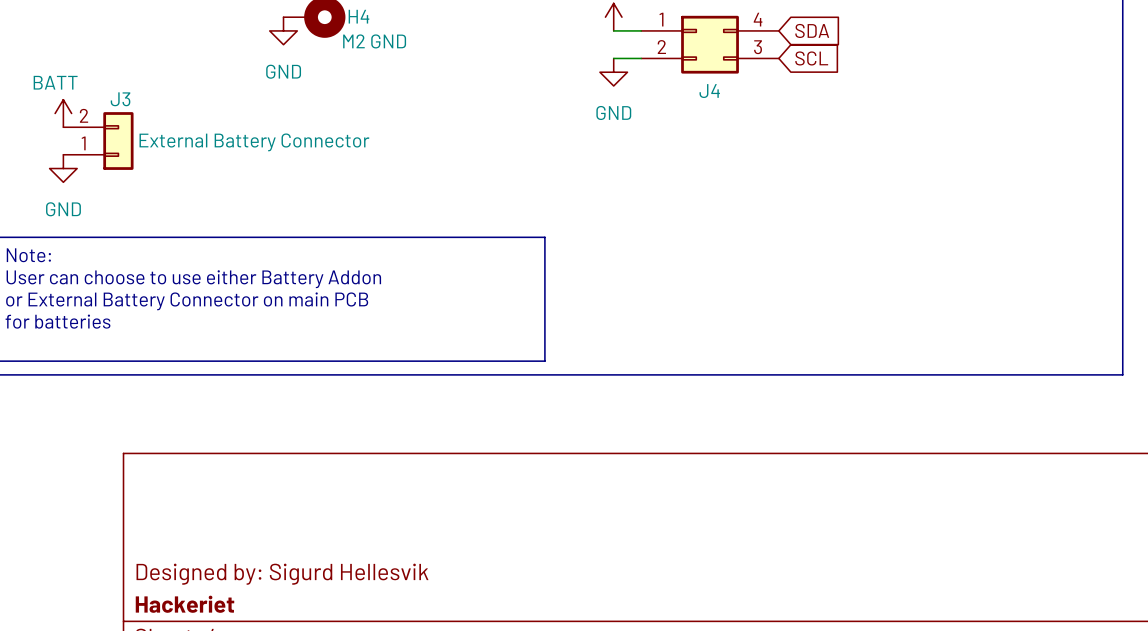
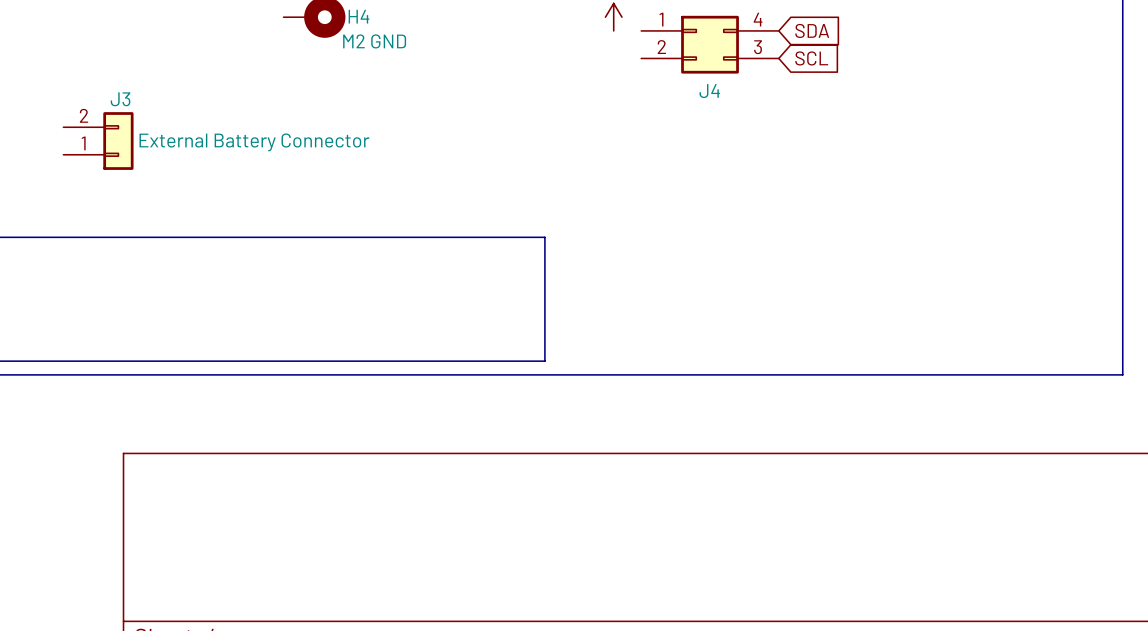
power symbol: GND (283, 30) -> none
wire: (613, 30) (641, 30) -> none
wire: (613, 58) (641, 58) -> none
power symbol: GND (613, 72) -> none
power symbol: BATT (63, 113) -> none
power symbol: GND (63, 168) -> none
text: Note: (28, 255) -> none
text: User can choose to use either Battery Addon (193, 279) -> none
text: or External Battery Connector on main PCB (187, 301) -> none
text: for batteries (57, 321) -> none
title block: Designed by: Sigurd Hellesvik (282, 574) -> none
title block: Hackeriet (184, 604) -> none

